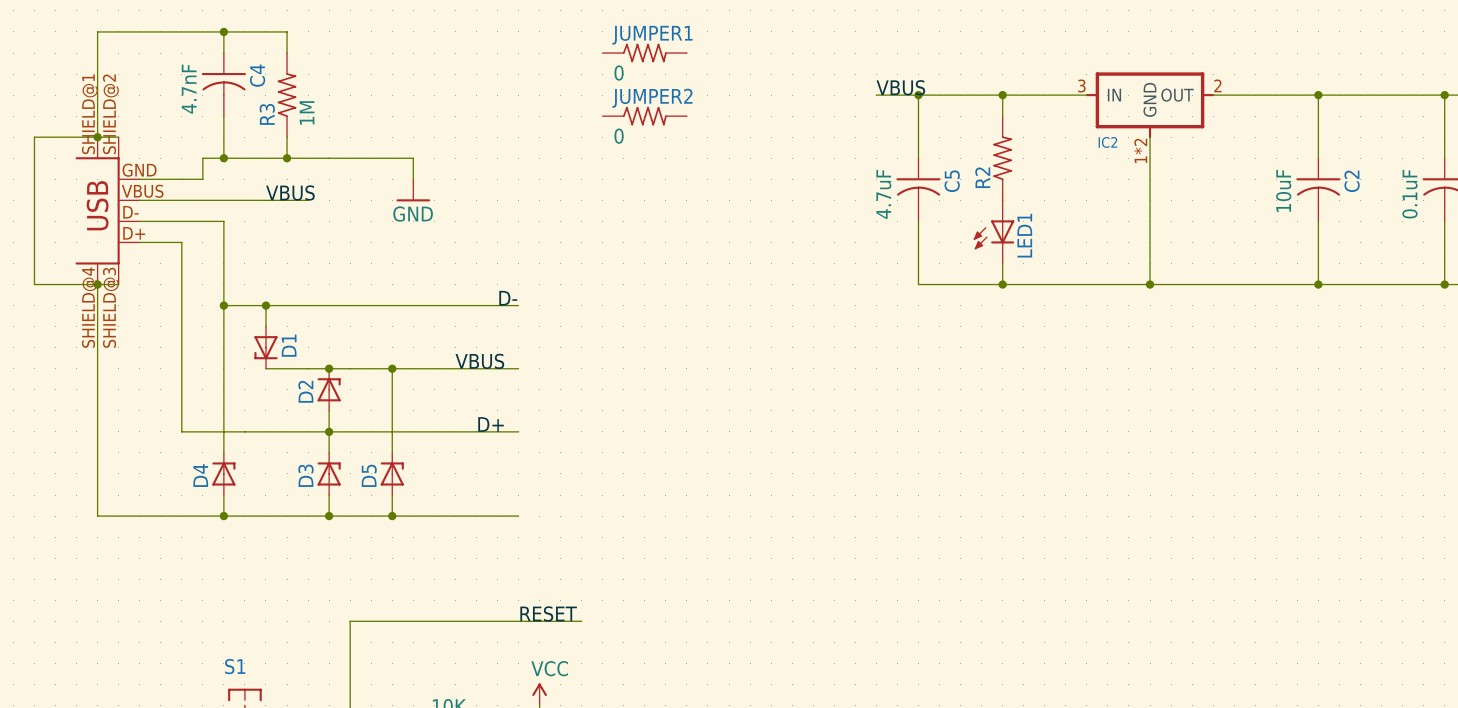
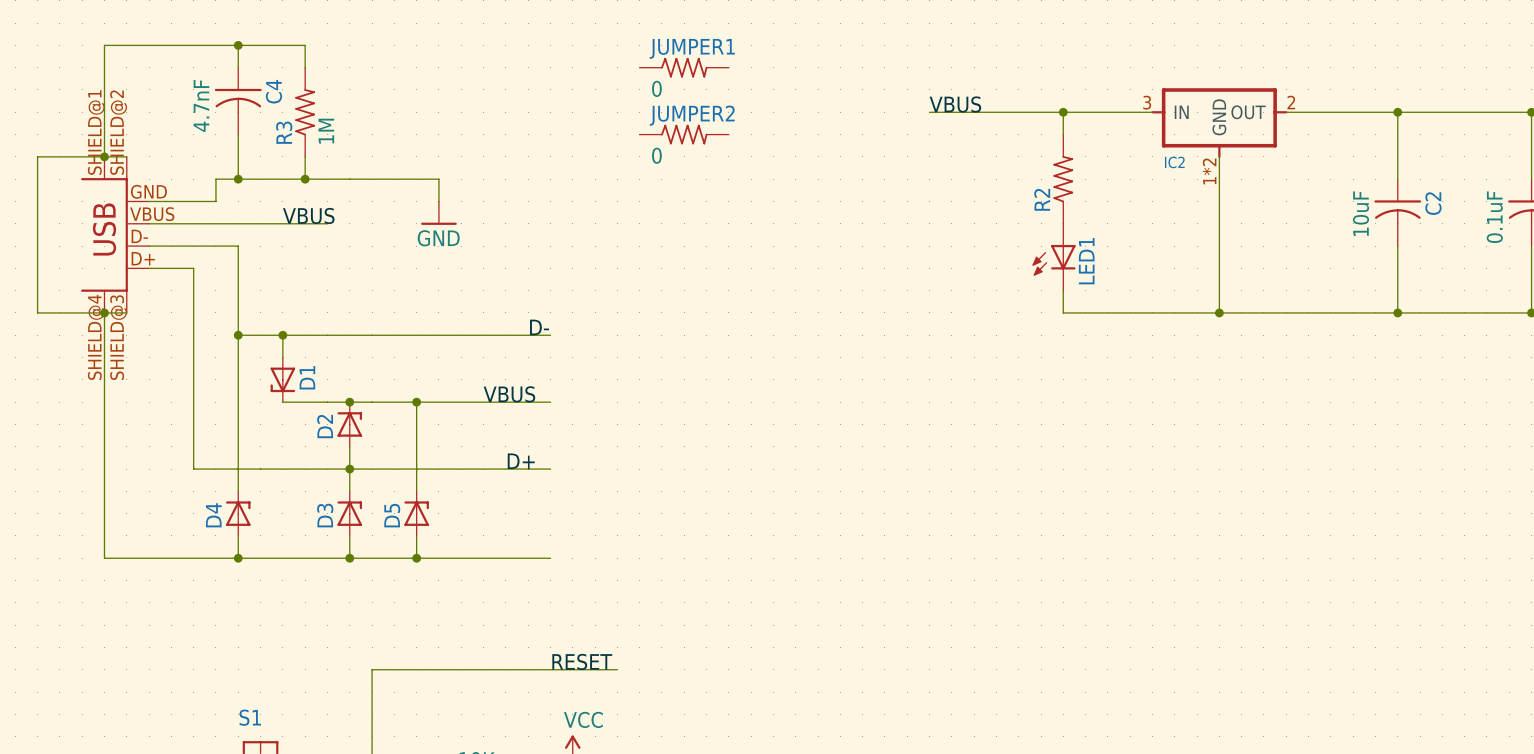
wire: (918, 95) (918, 158) -> none
junction: (918, 95) -> none
C5: 4.7uF (918, 189) -> none
wire: (918, 221) (918, 284) (1002, 284) -> none
junction: (1002, 284) -> none

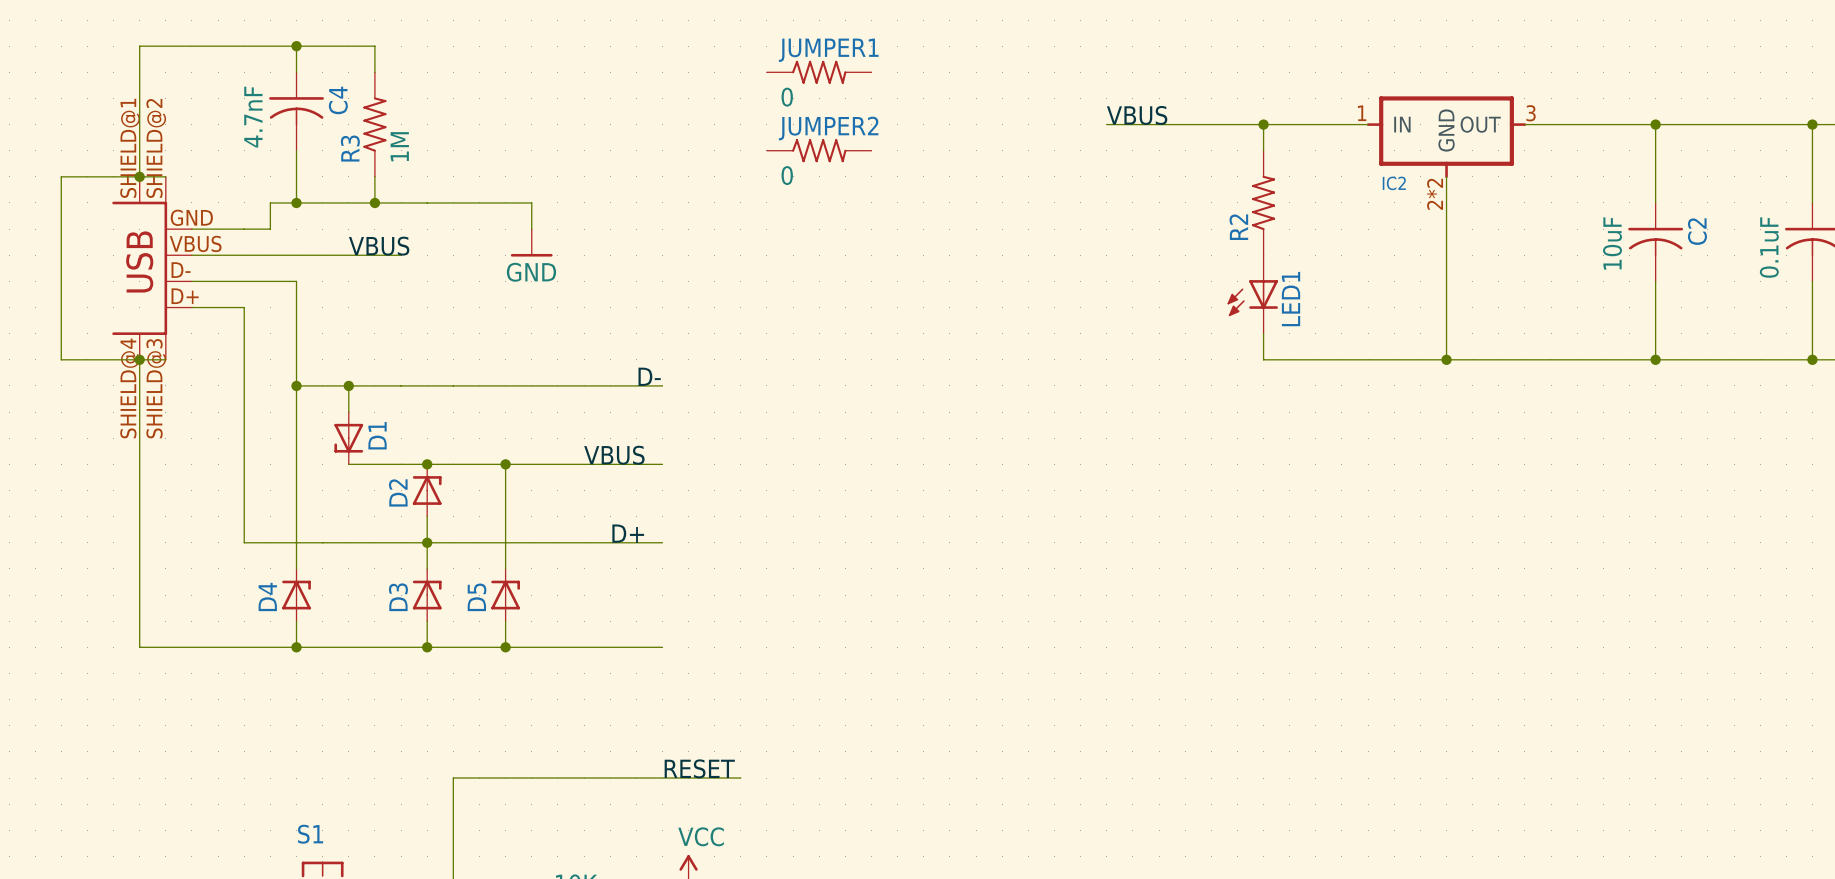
IC2 pin number: 3 (1147, 102) -> 1 (1362, 113)
IC2 pin number: 2 (1291, 102) -> 3 (1531, 113)
IC2 pin number: 1*2 (1209, 171) -> 2*2 (1435, 194)

